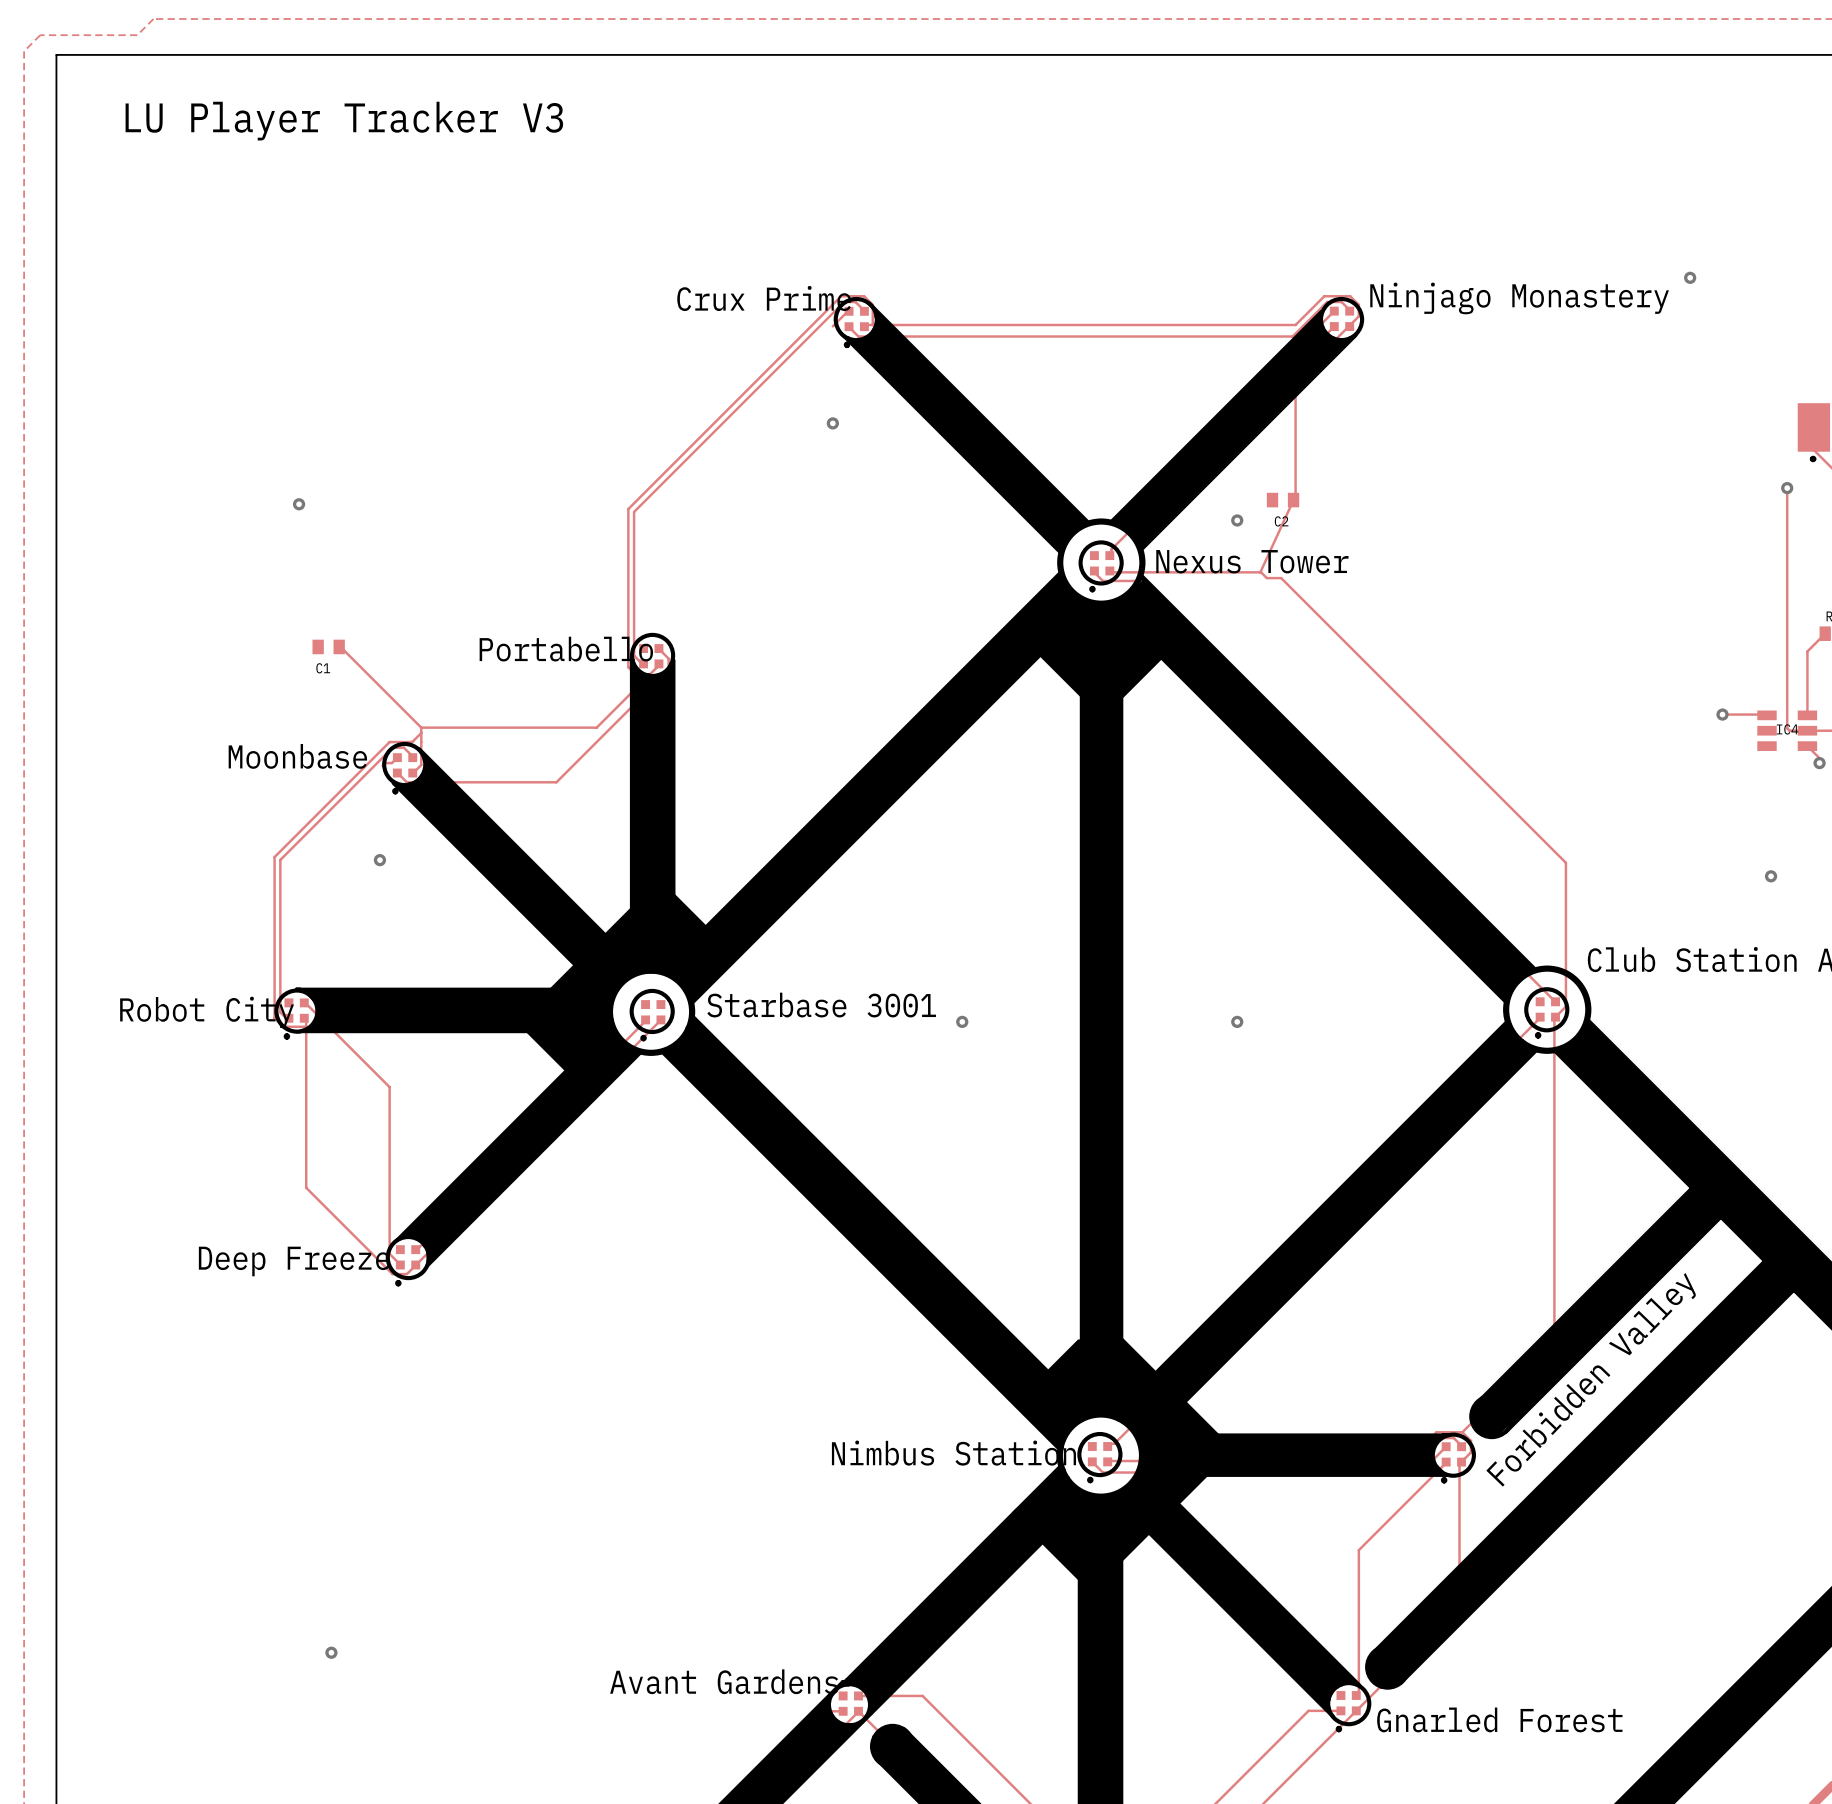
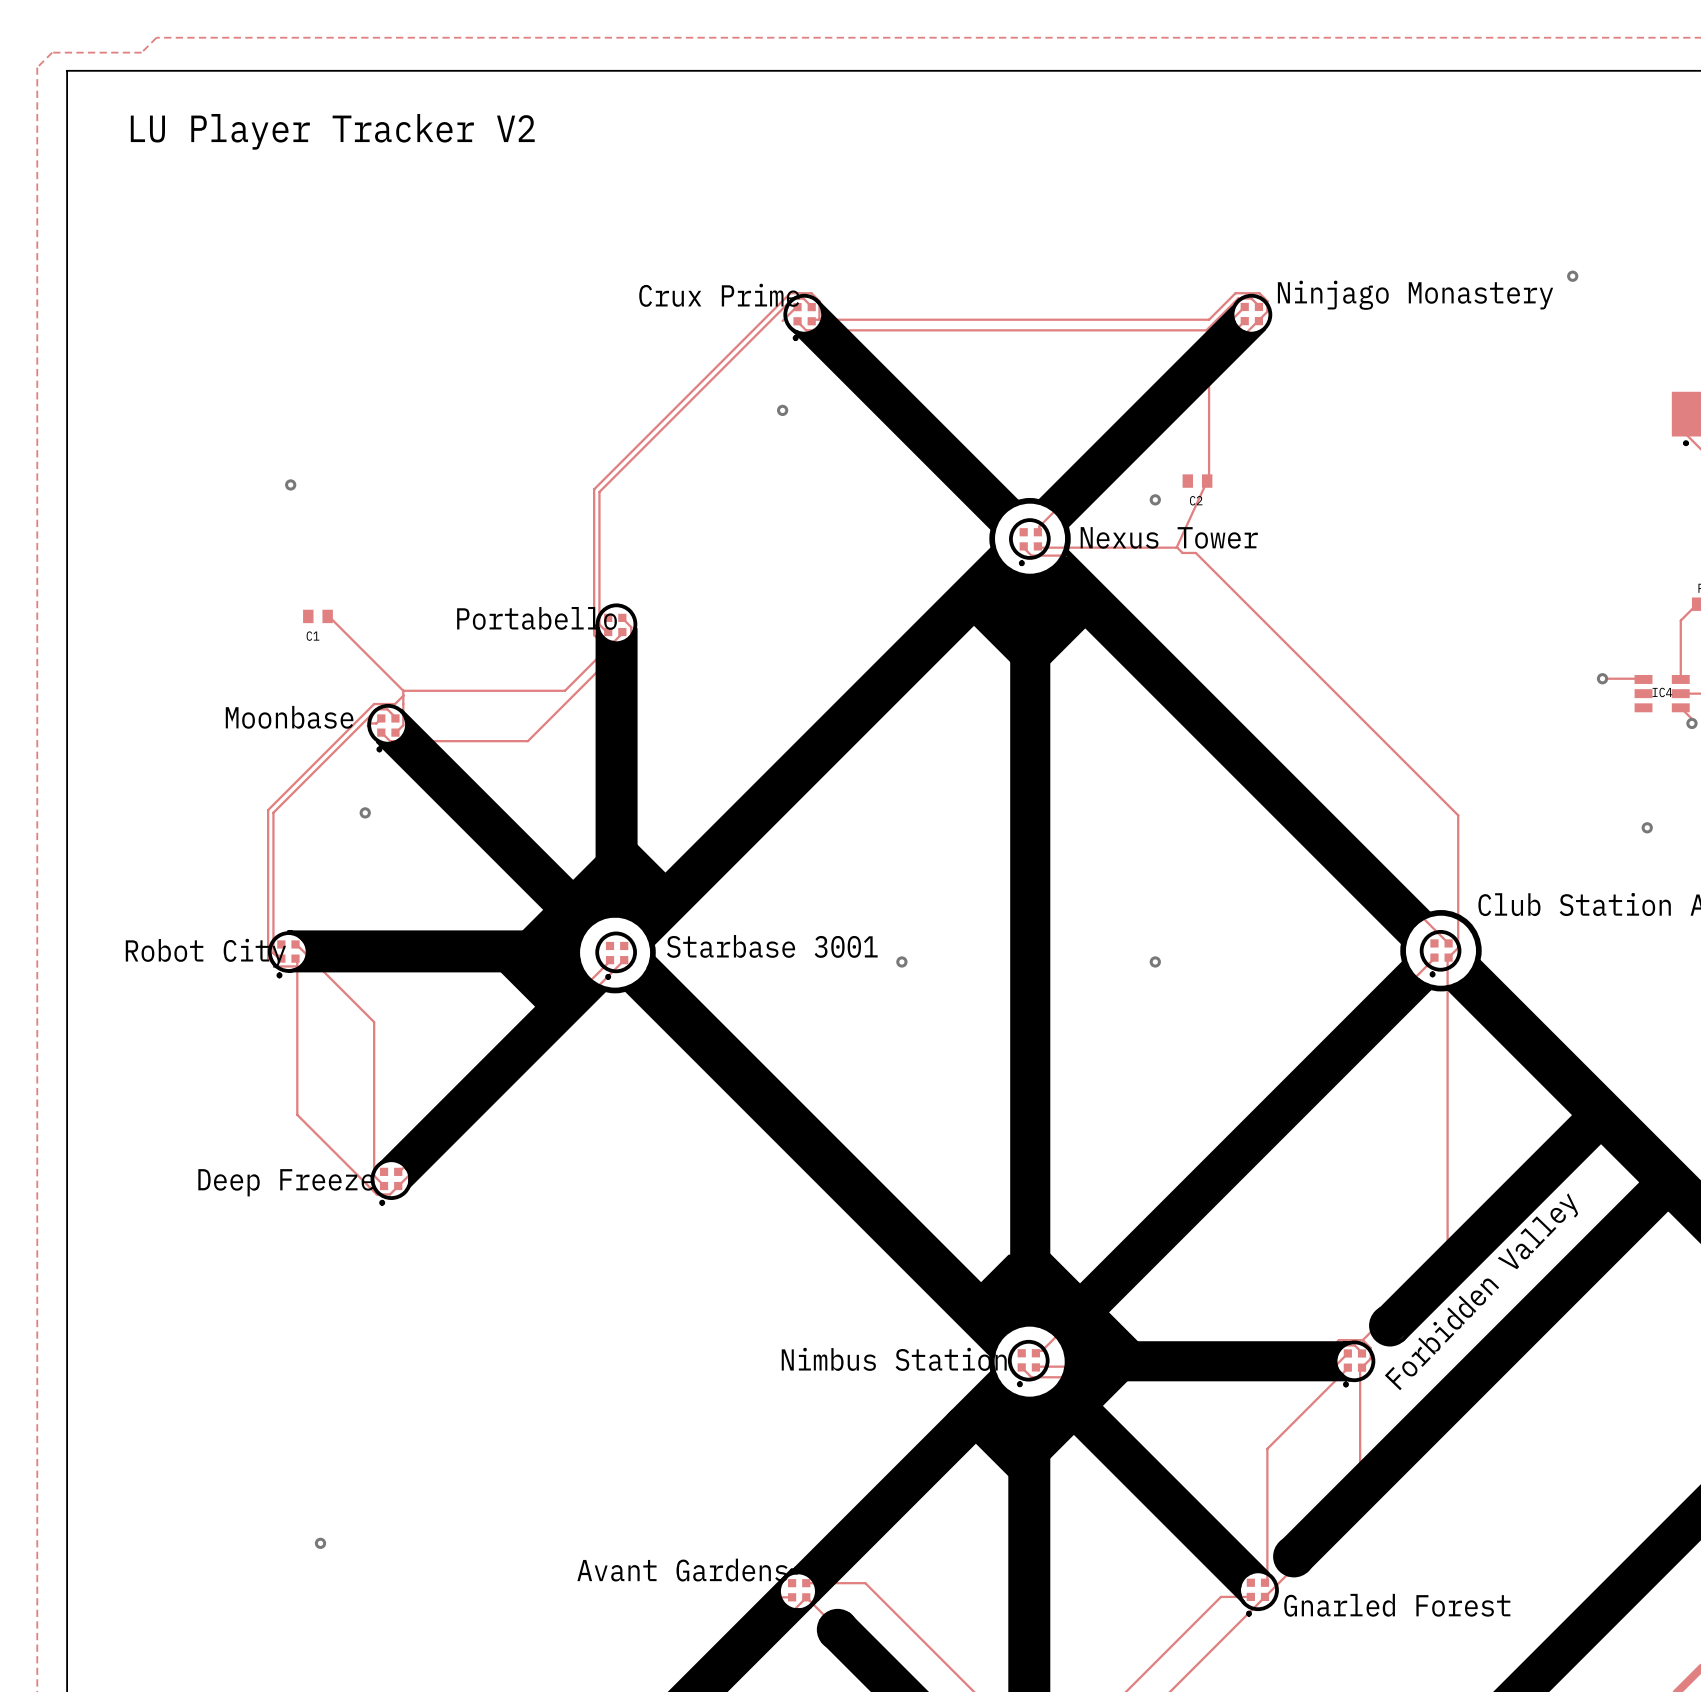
text: LU Player Tracker V3 (344, 121) -> LU Player Tracker V2 (332, 131)
track: (1787, 488) (1787, 728) (1789, 730) (1807, 730) -> none
via: (1787, 488) -> none

